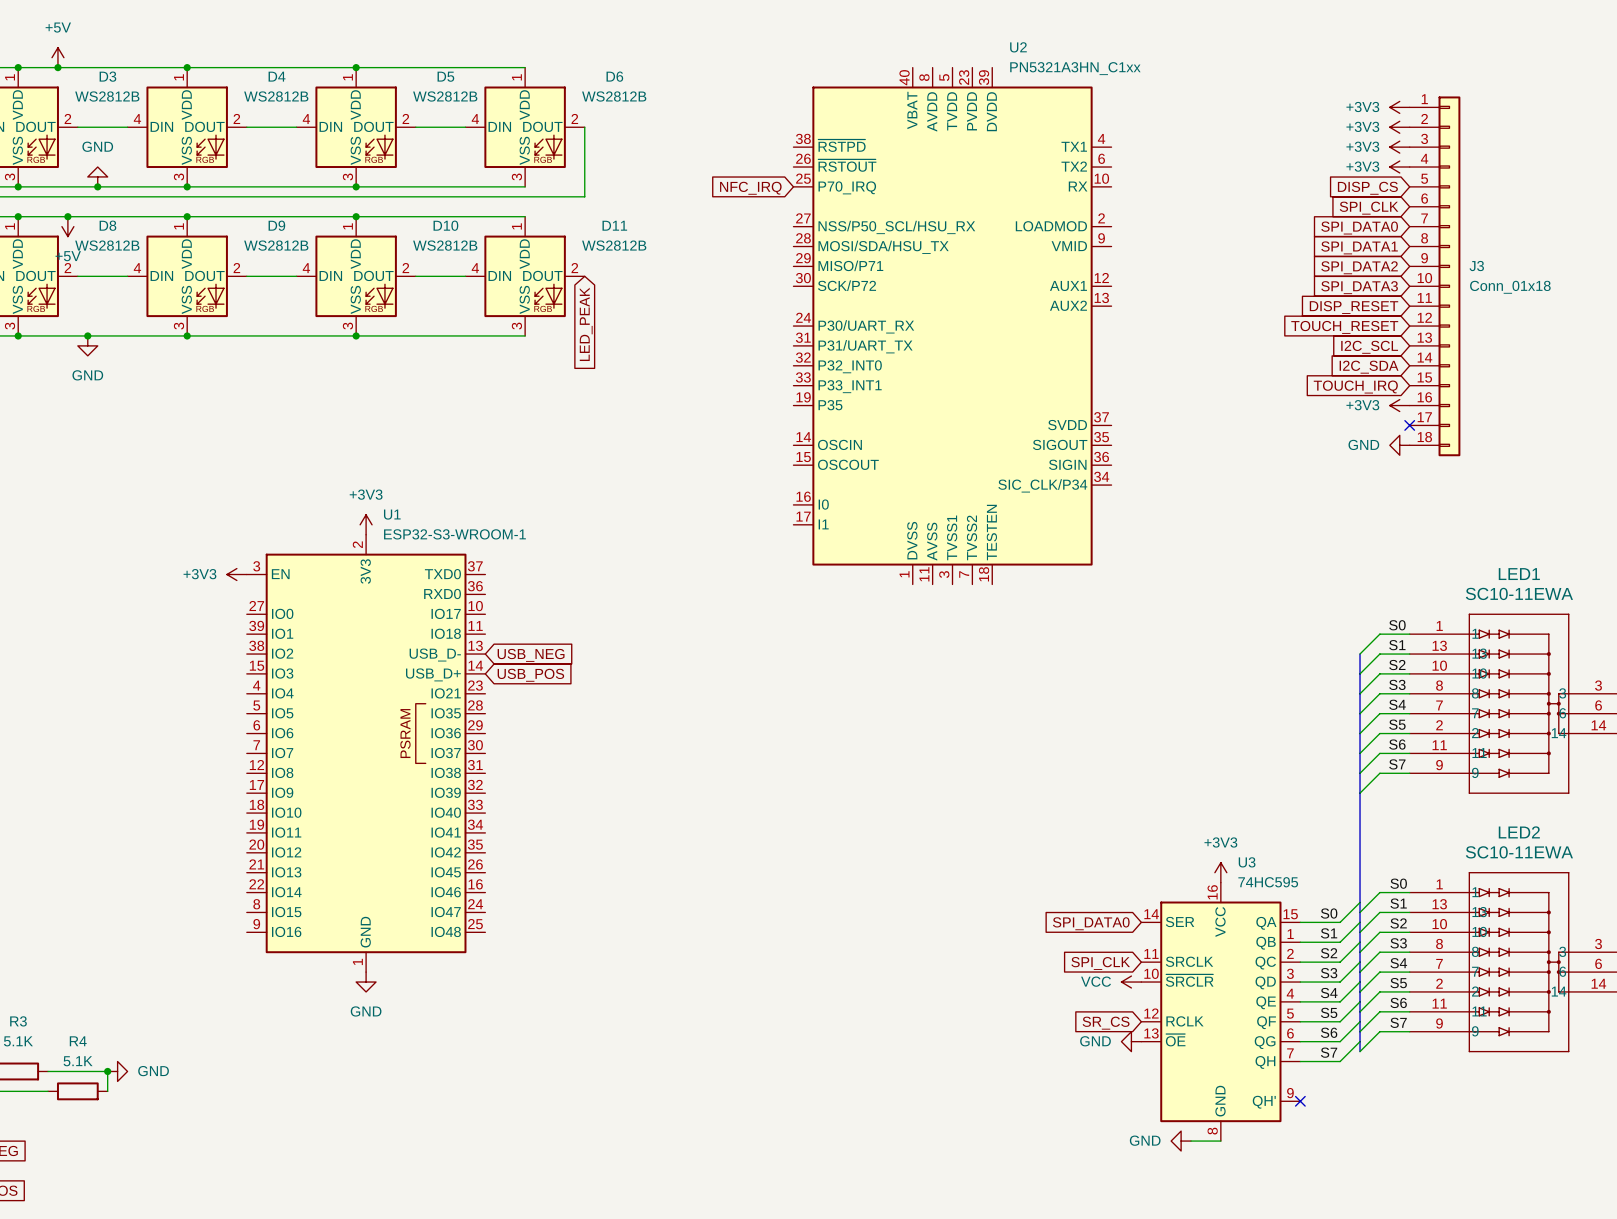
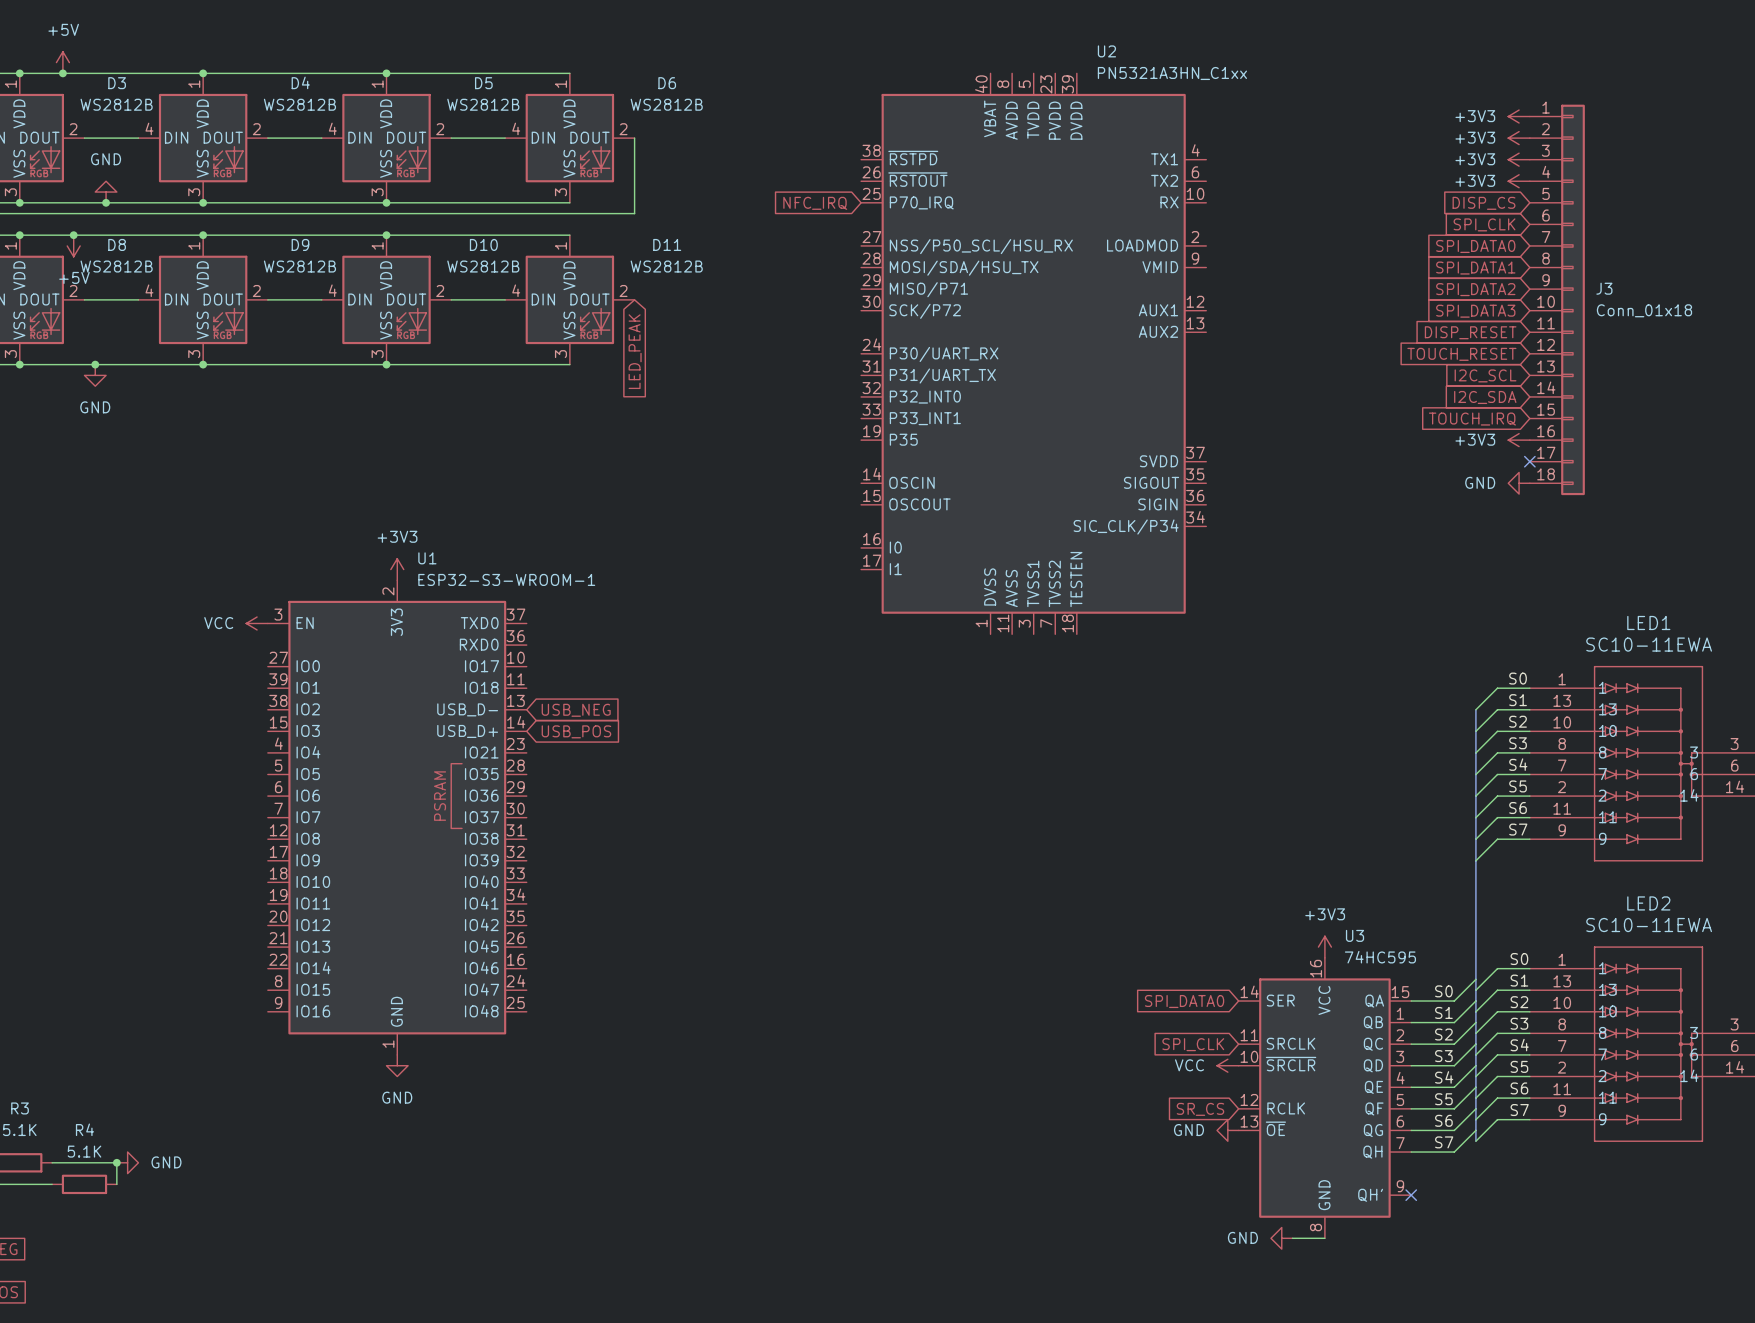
power symbol: +3V3 (236, 574) -> VCC (257, 623)

